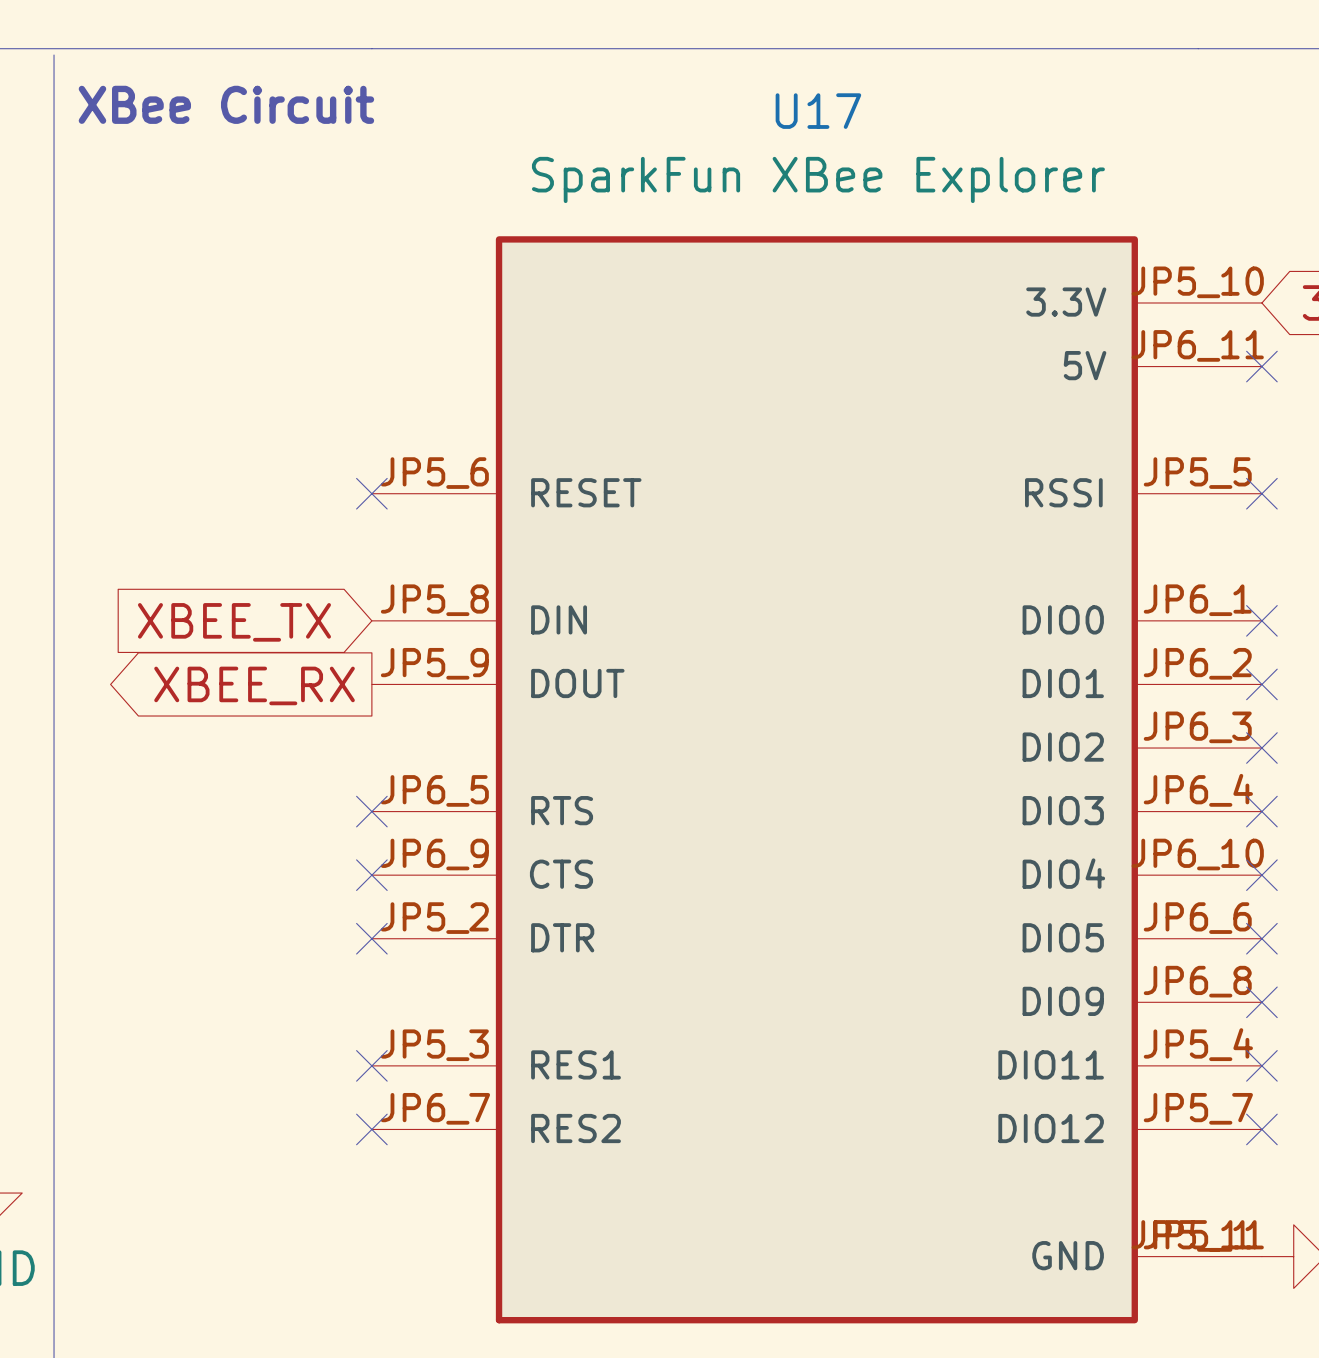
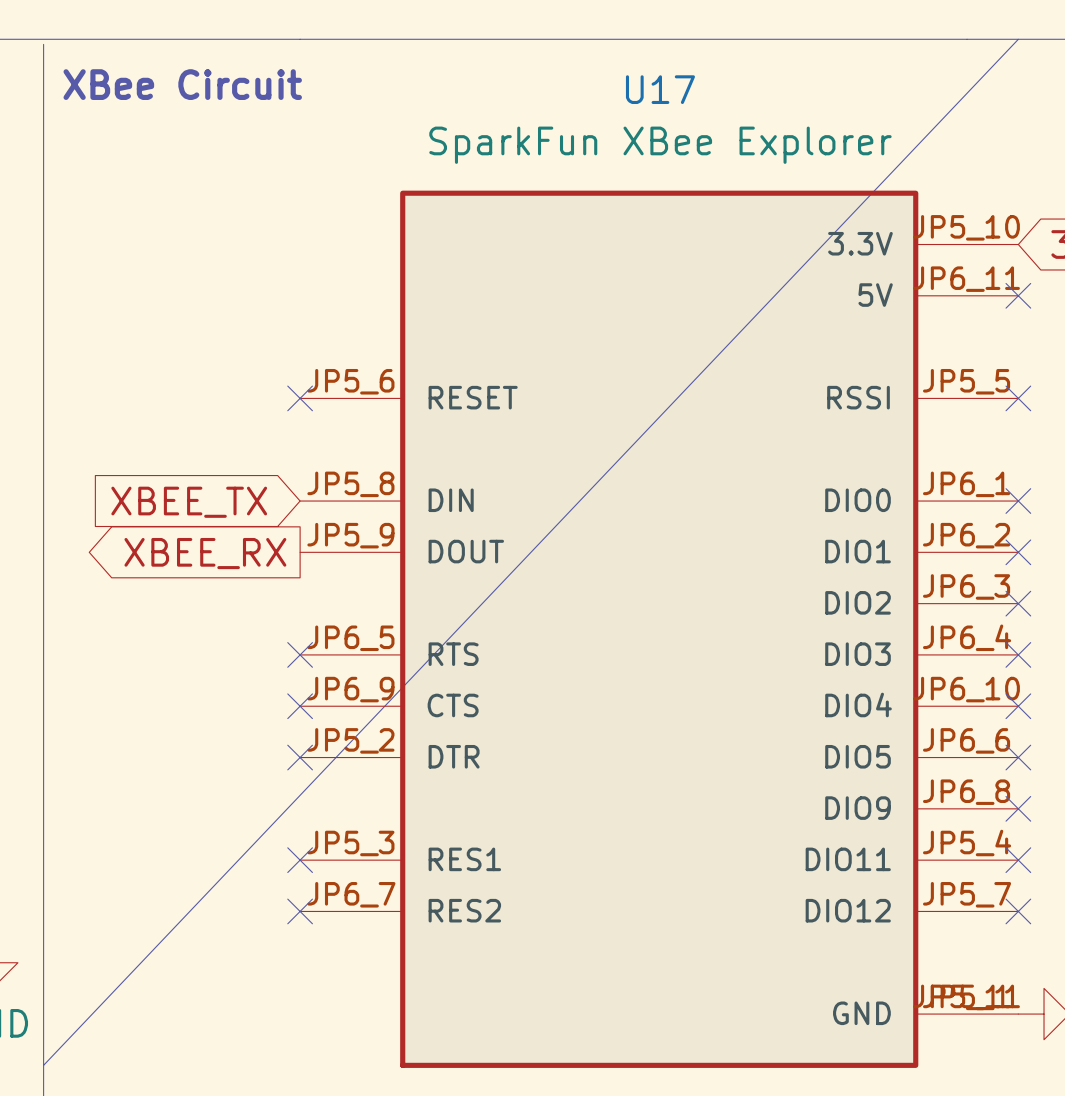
line: none -> (1018, 39) (43, 1065)

